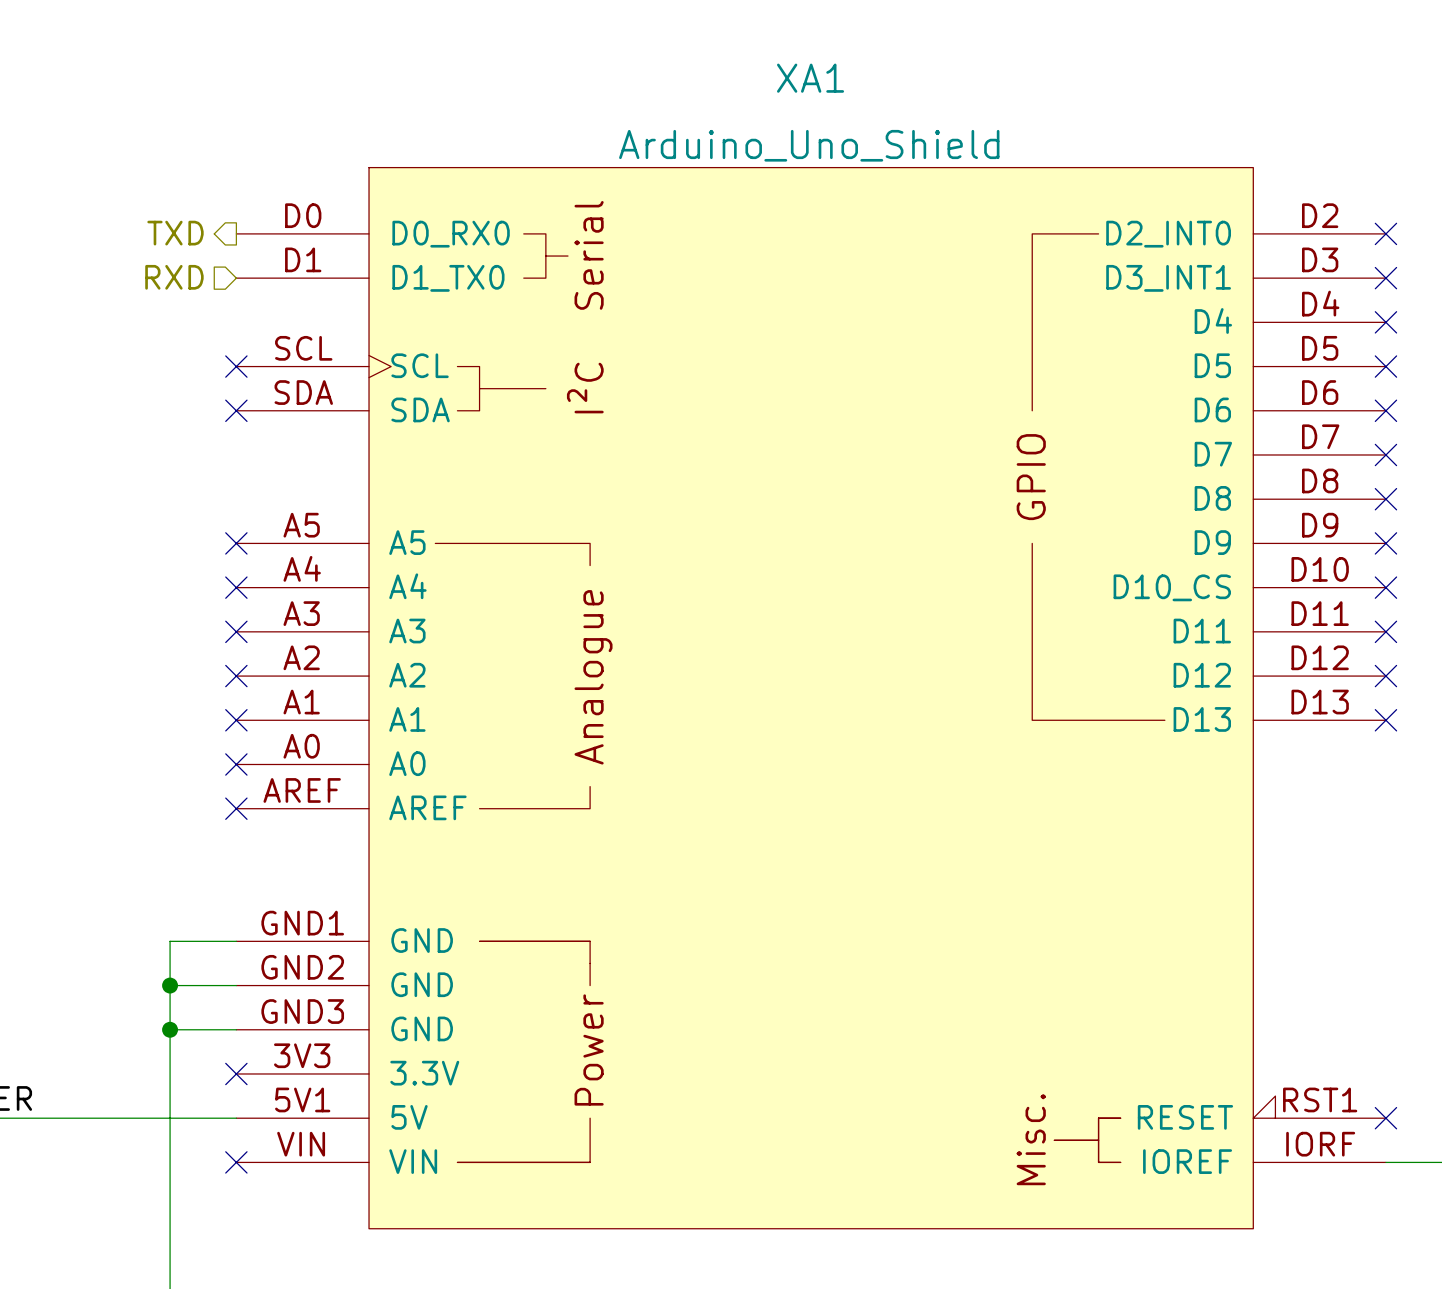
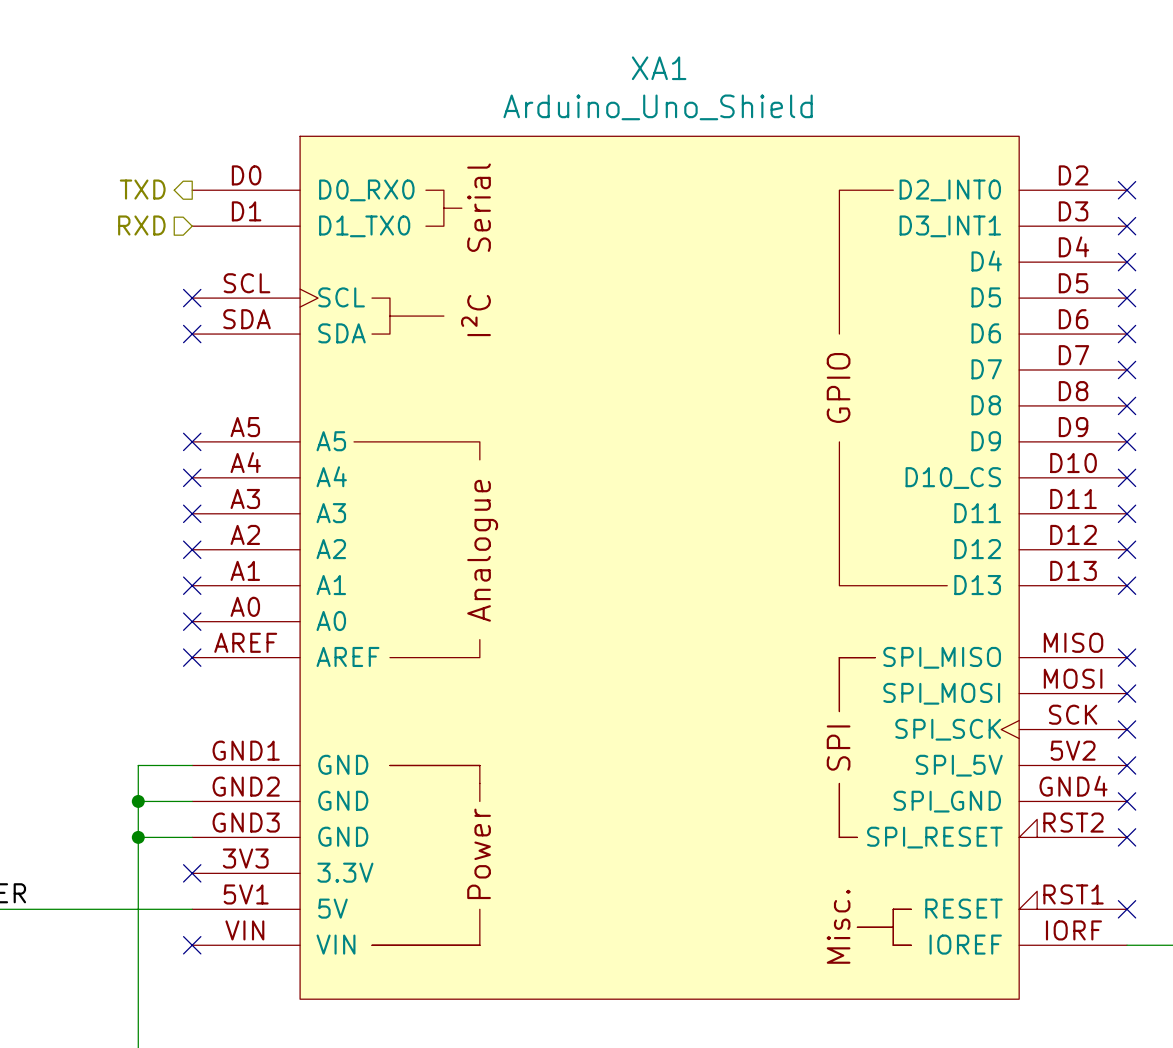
XA1 symbol: [236, 167, 1386, 1229] -> [192, 136, 1128, 1000]
no-connect mark: none -> (1127, 657)
no-connect mark: none -> (1127, 693)
no-connect mark: none -> (1127, 729)
no-connect mark: none -> (1127, 765)
no-connect mark: none -> (1127, 801)
no-connect mark: none -> (1127, 837)

